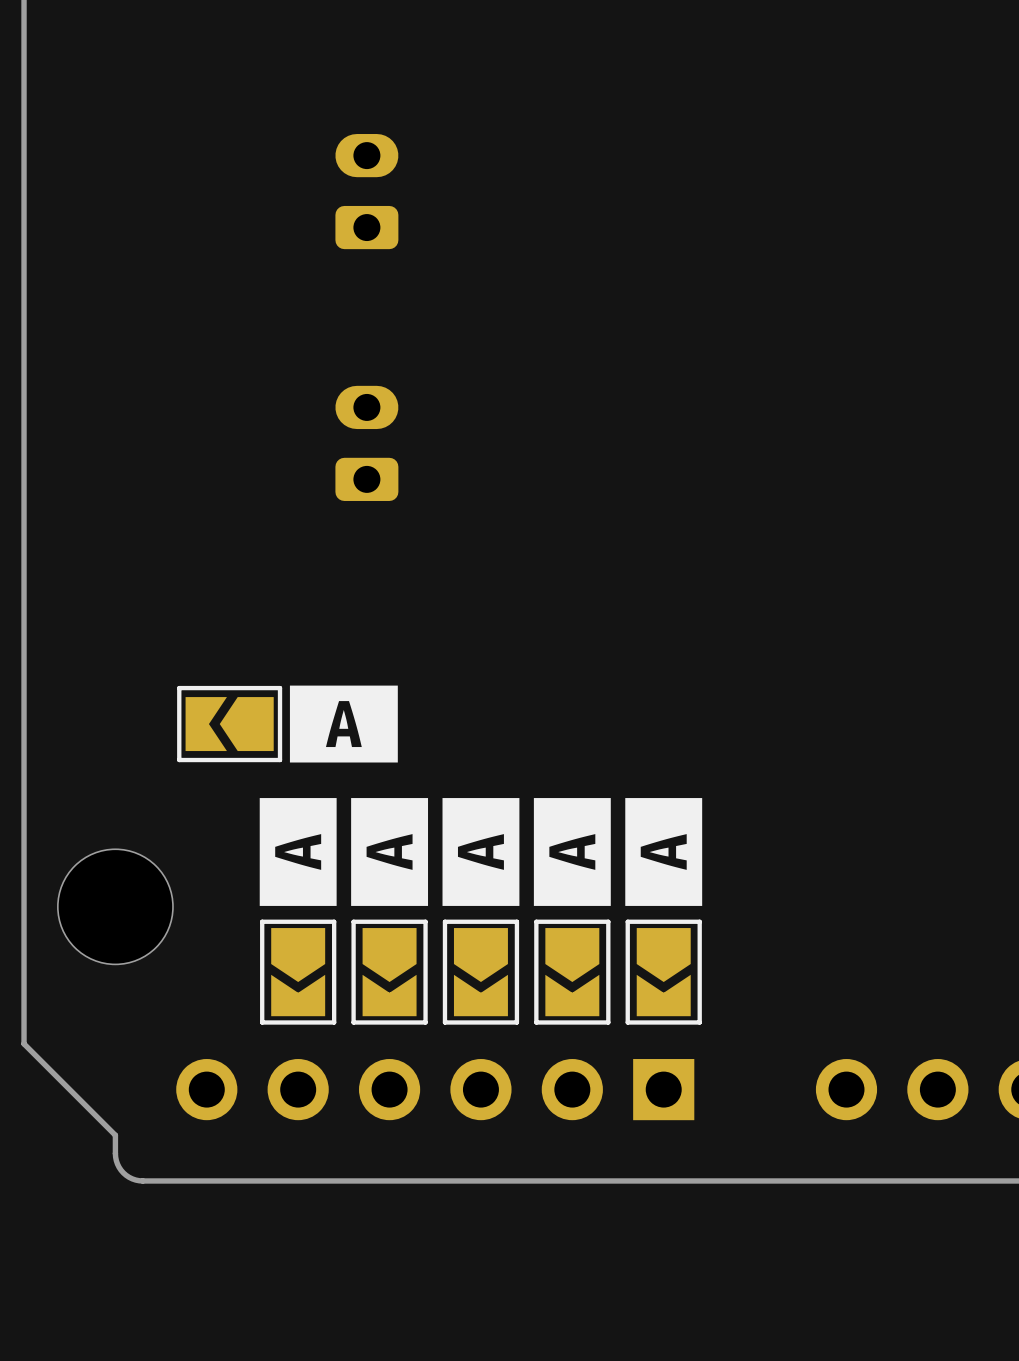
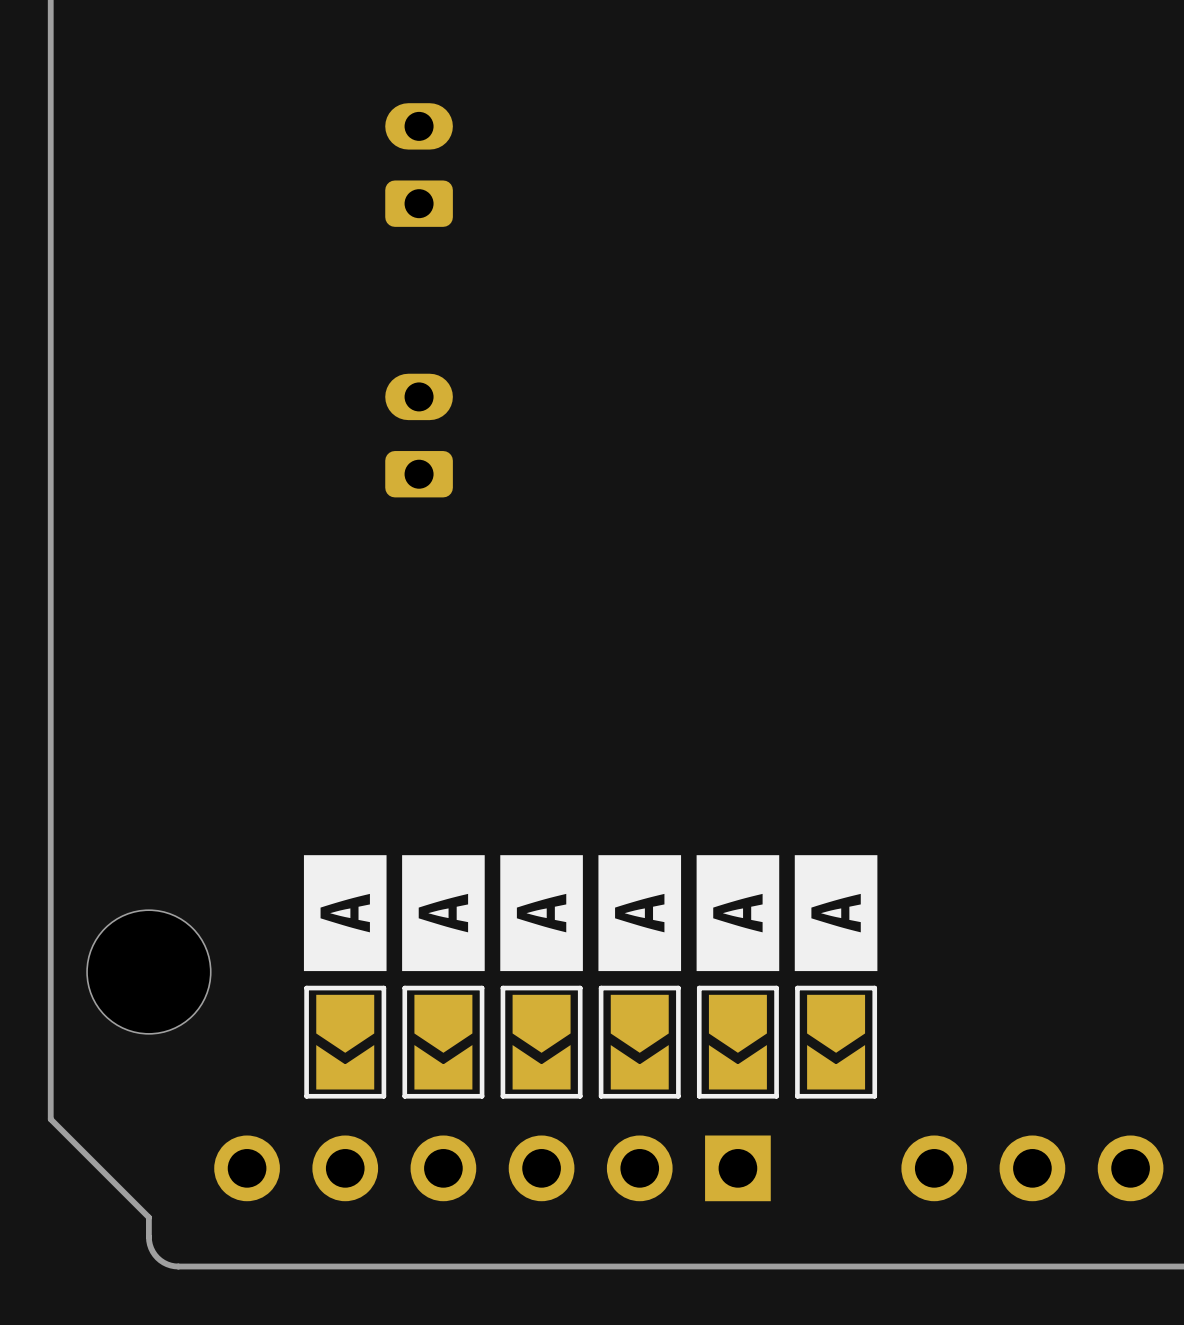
part position: (366, 191) -> (419, 165)
part position: (366, 443) -> (419, 435)
drawing: [289, 685, 398, 763] -> none
part rotation: 0° (229, 724) -> 90° counterclockwise (836, 1042)
part position: (229, 724) -> (836, 1042)
drawing: none -> [794, 855, 878, 972]

